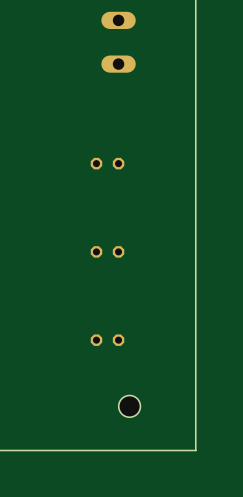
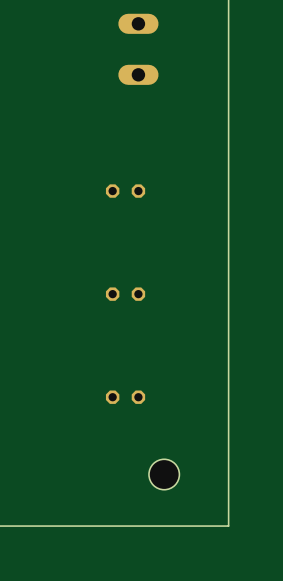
hole: (129, 406) -> none
hole: none -> (164, 474)

